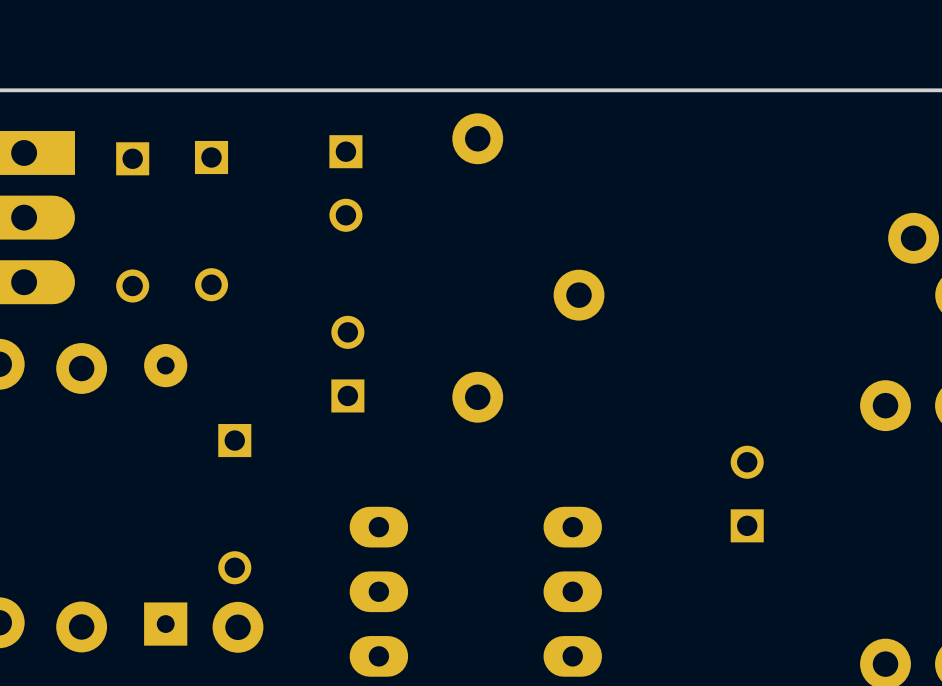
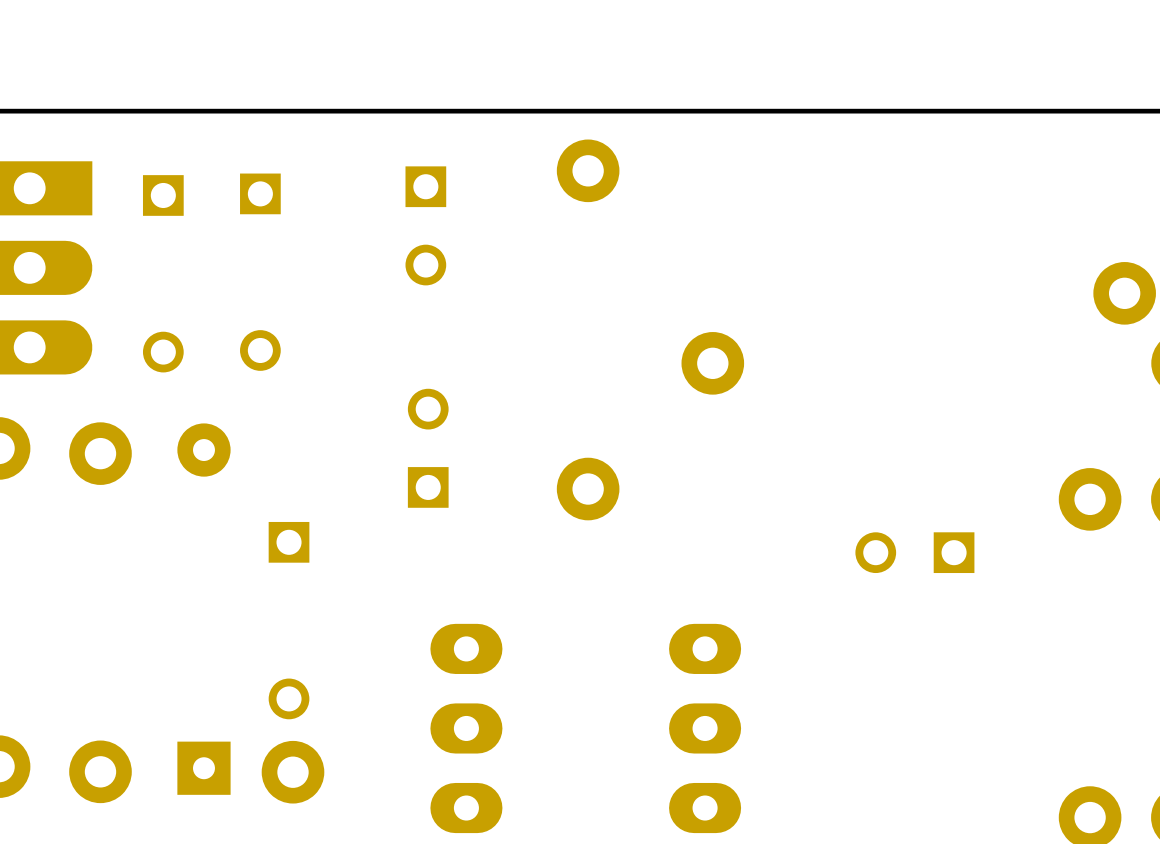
part rotation: 0° (747, 494) -> 90° counterclockwise (914, 552)

